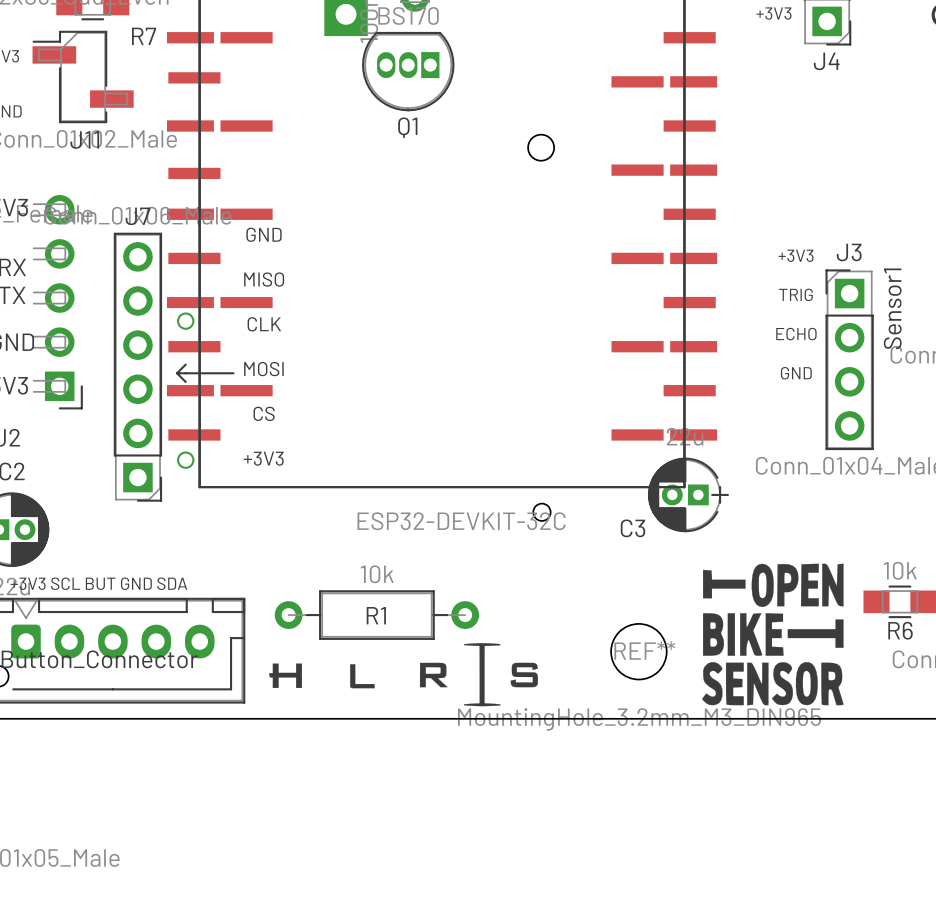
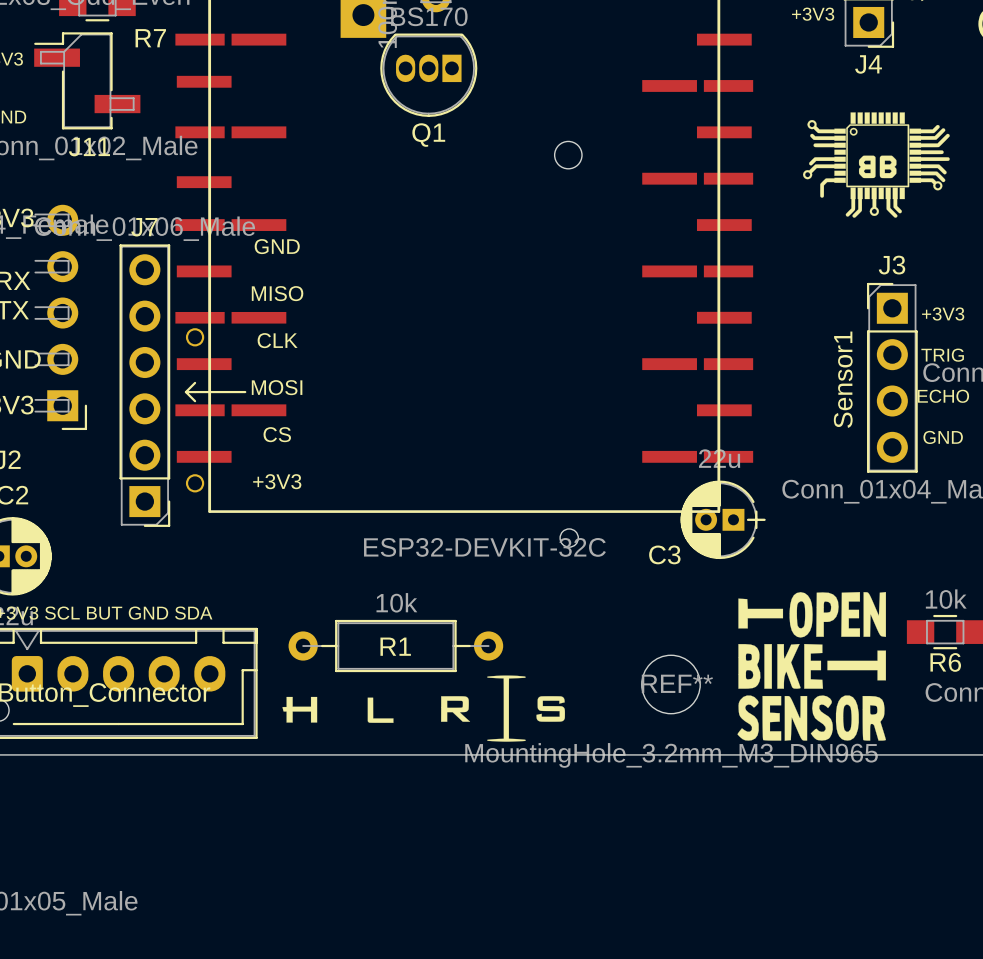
drawing: none -> [803, 112, 950, 218]
text: +3V3 (796, 255) -> none
text position: TRIG (795, 294) -> TRIG (942, 355)
text: Sensor1 (892, 308) -> +3V3 (943, 314)
text position: ECHO (796, 334) -> ECHO (943, 396)
text: none -> Sensor1 (843, 379)
text position: GND (796, 373) -> GND (943, 437)

